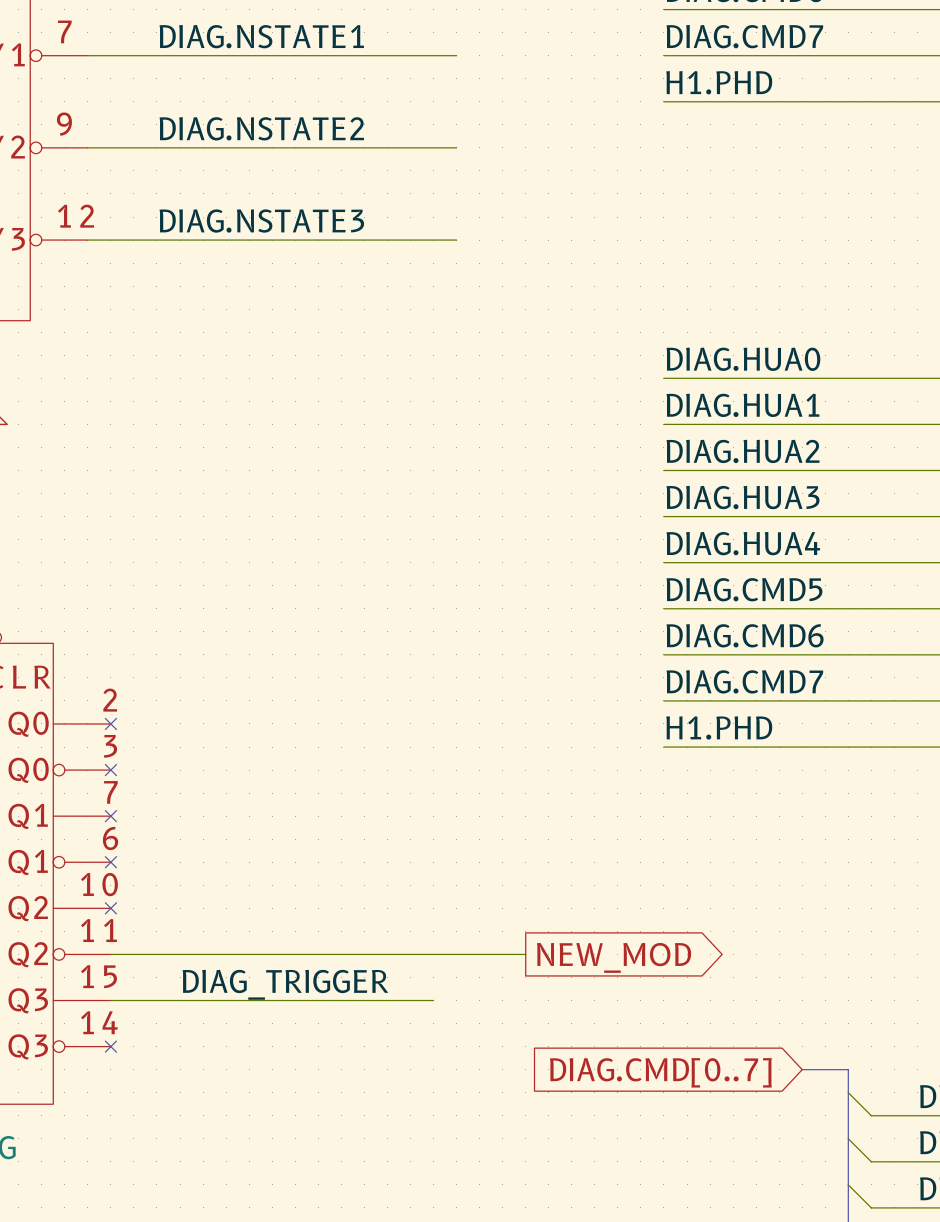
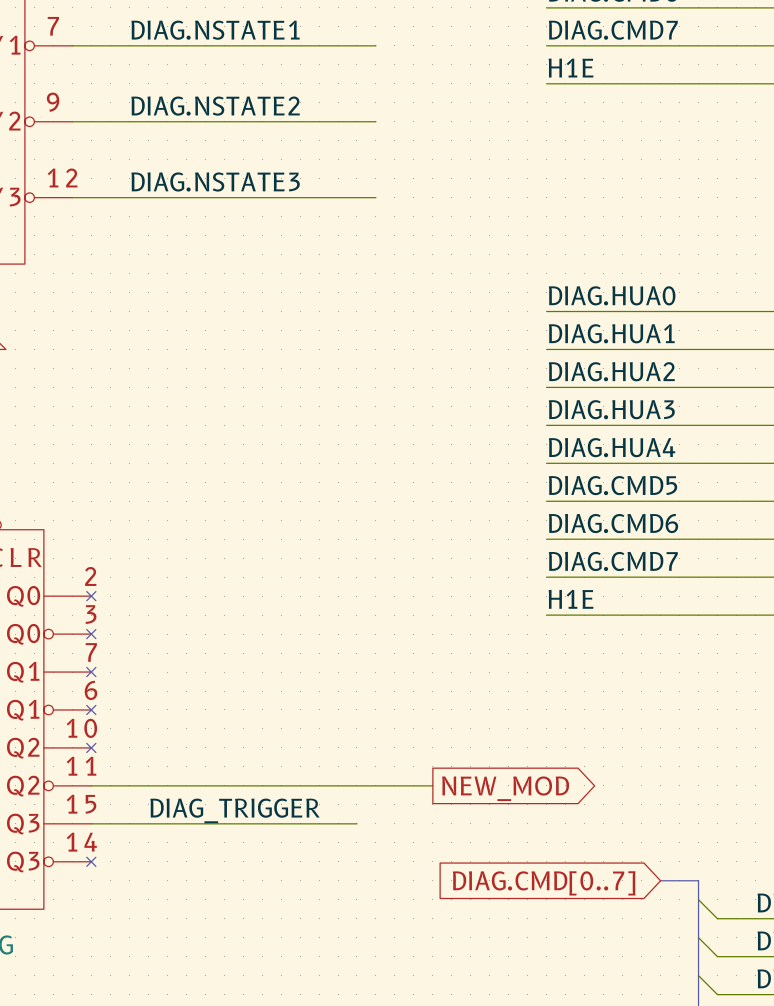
label: H1.PHD (719, 82) -> H1E (571, 68)
label: H1.PHD (719, 727) -> H1E (571, 599)

